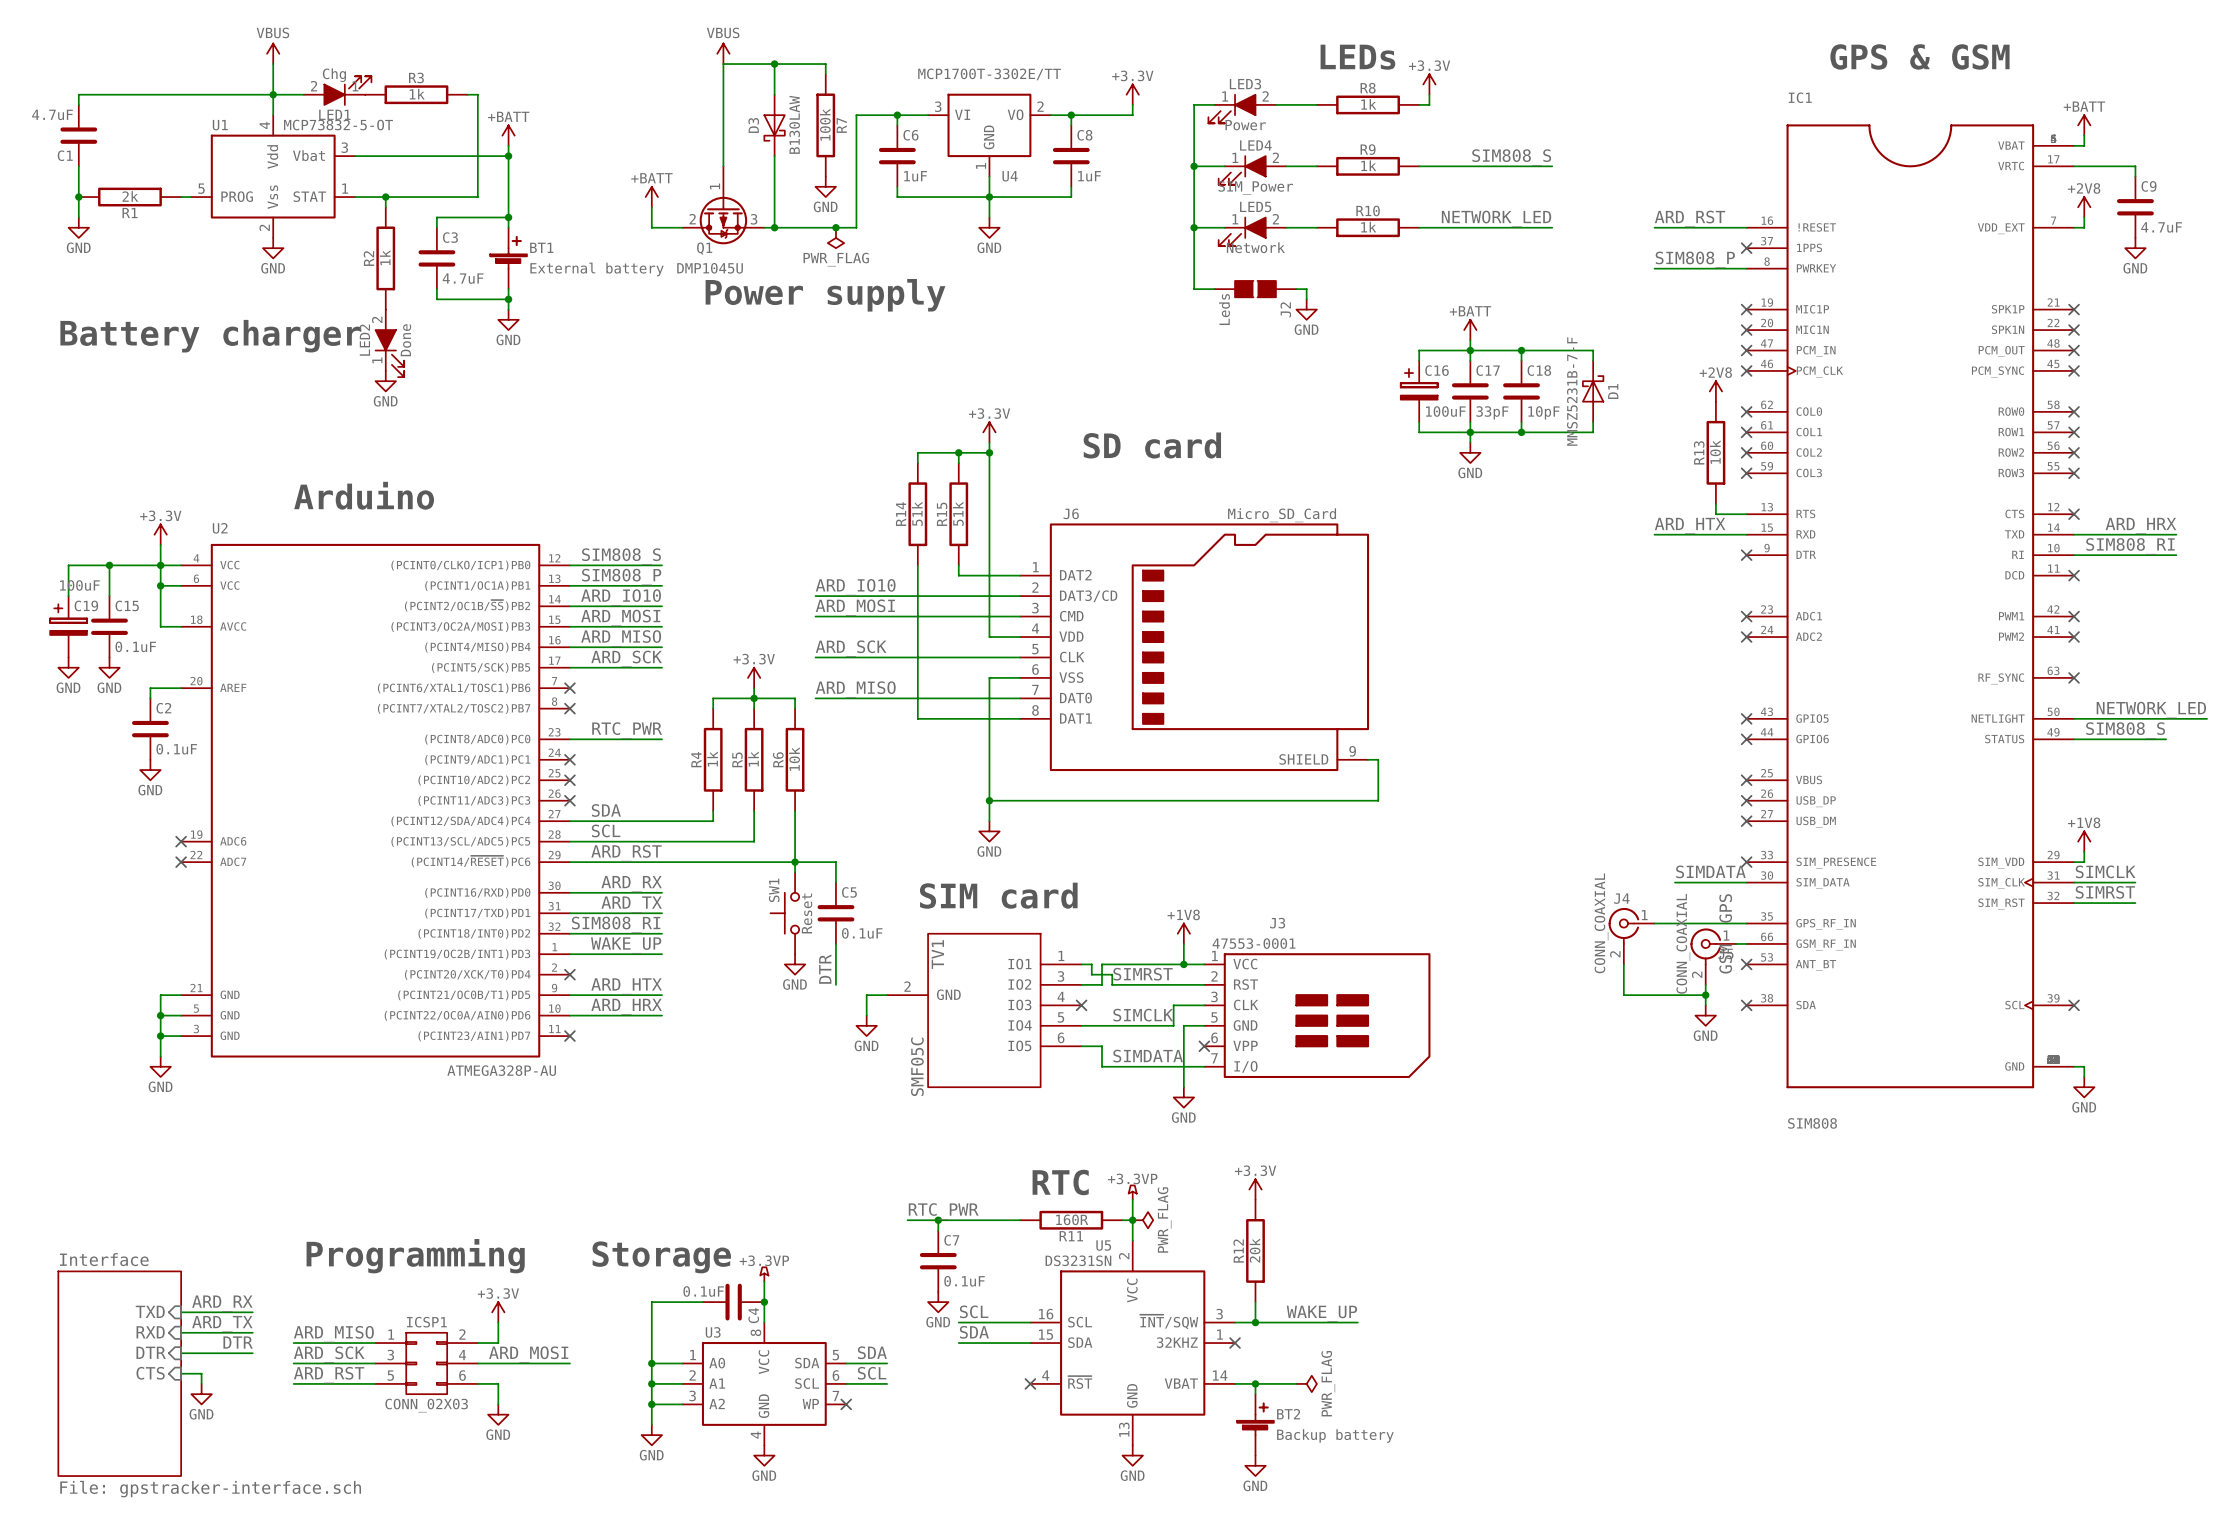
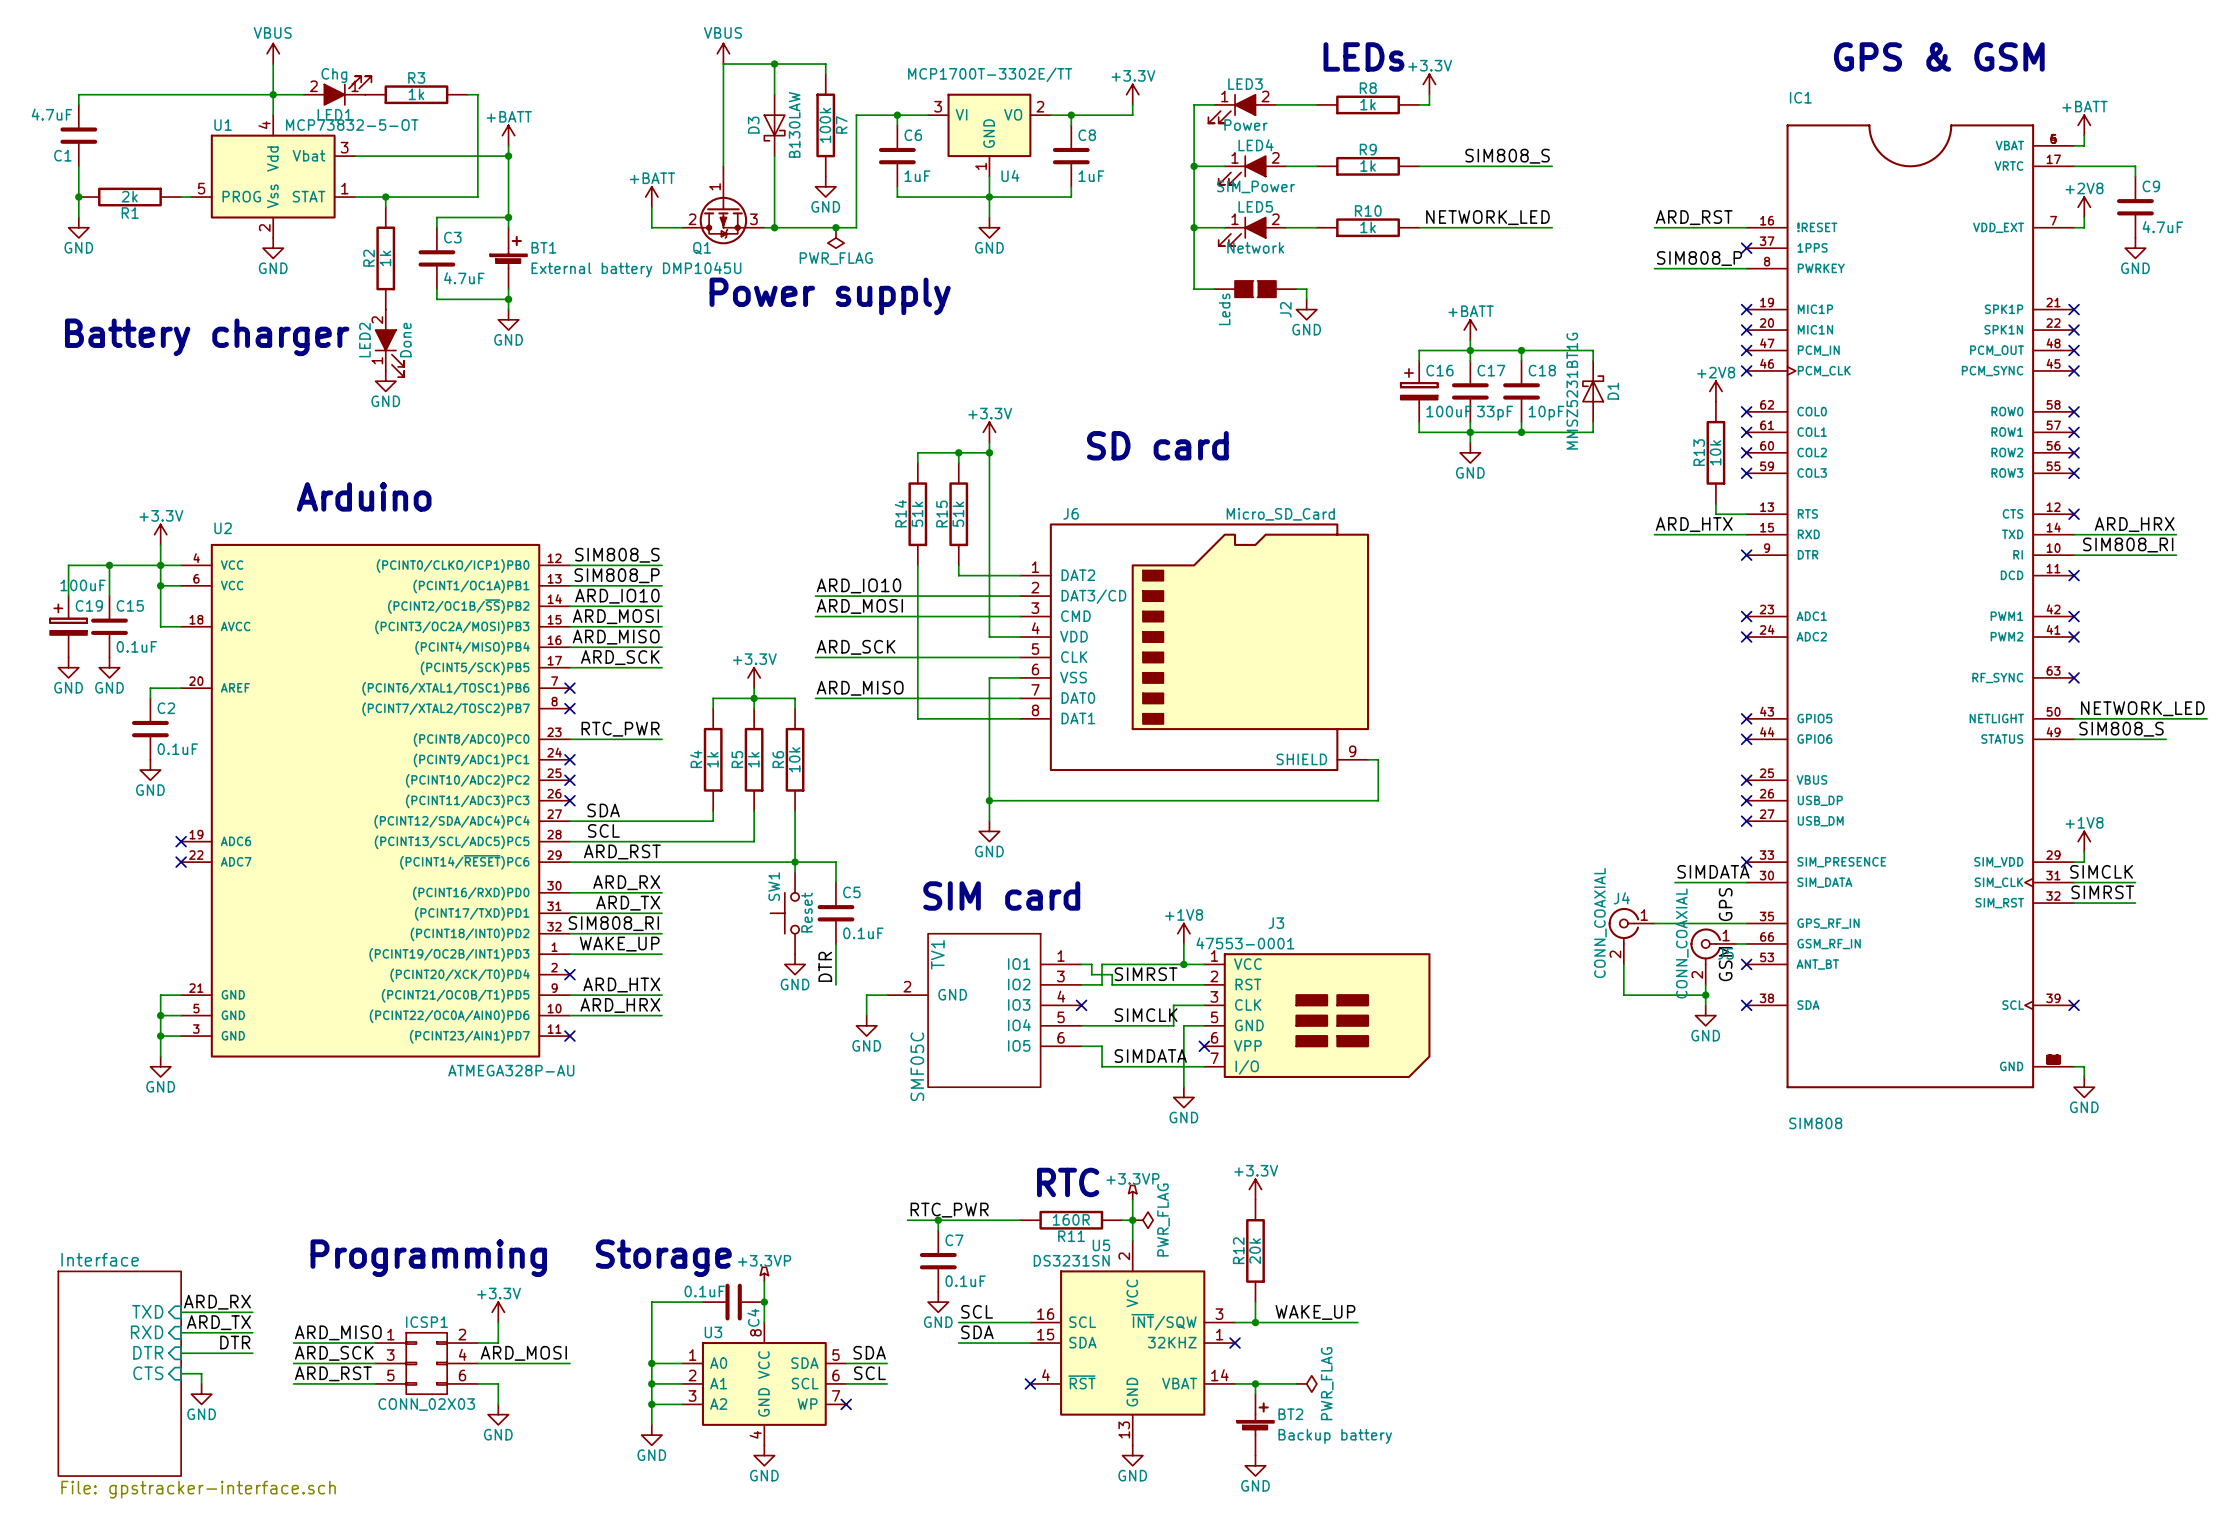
D1 value: MMSZ5231B-7-F (1572, 391) -> MMSZ5231BT1G (1572, 391)

